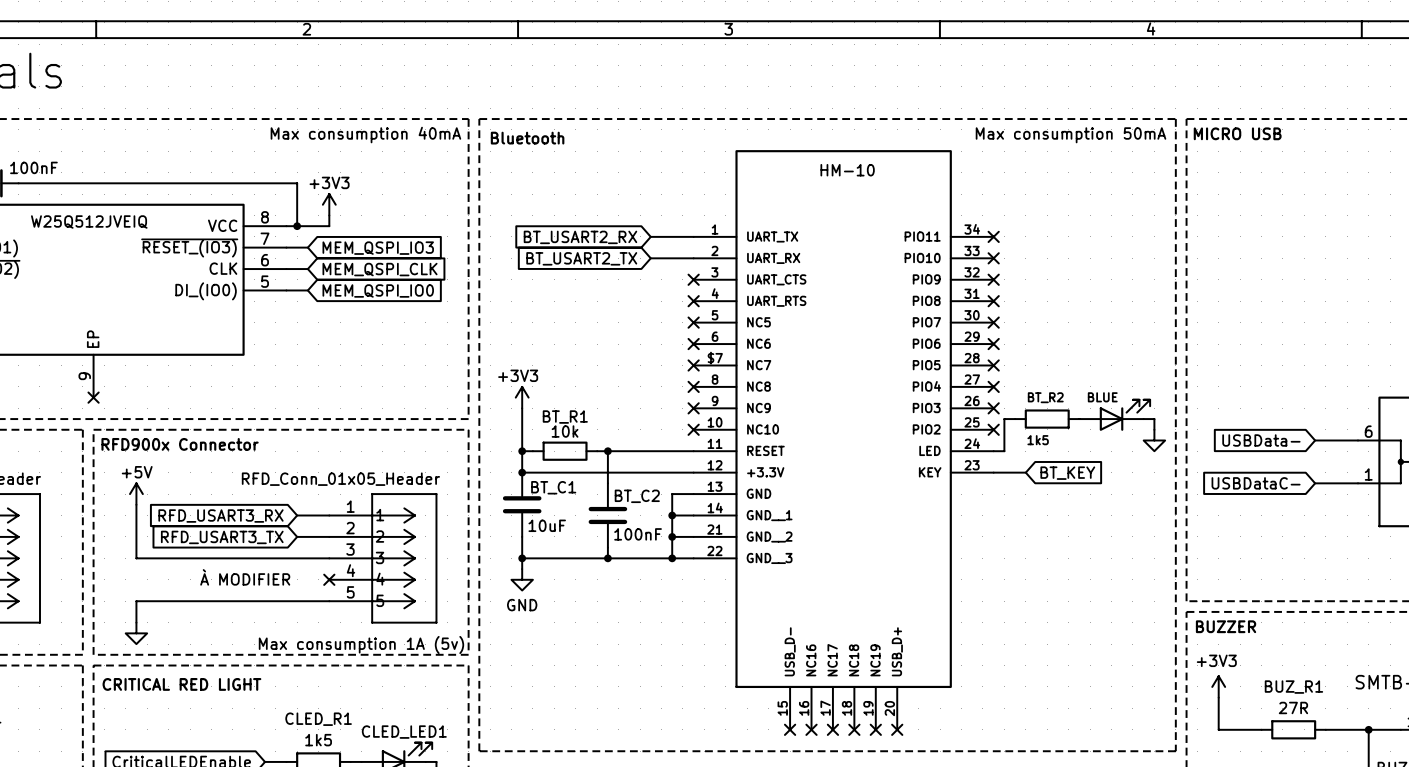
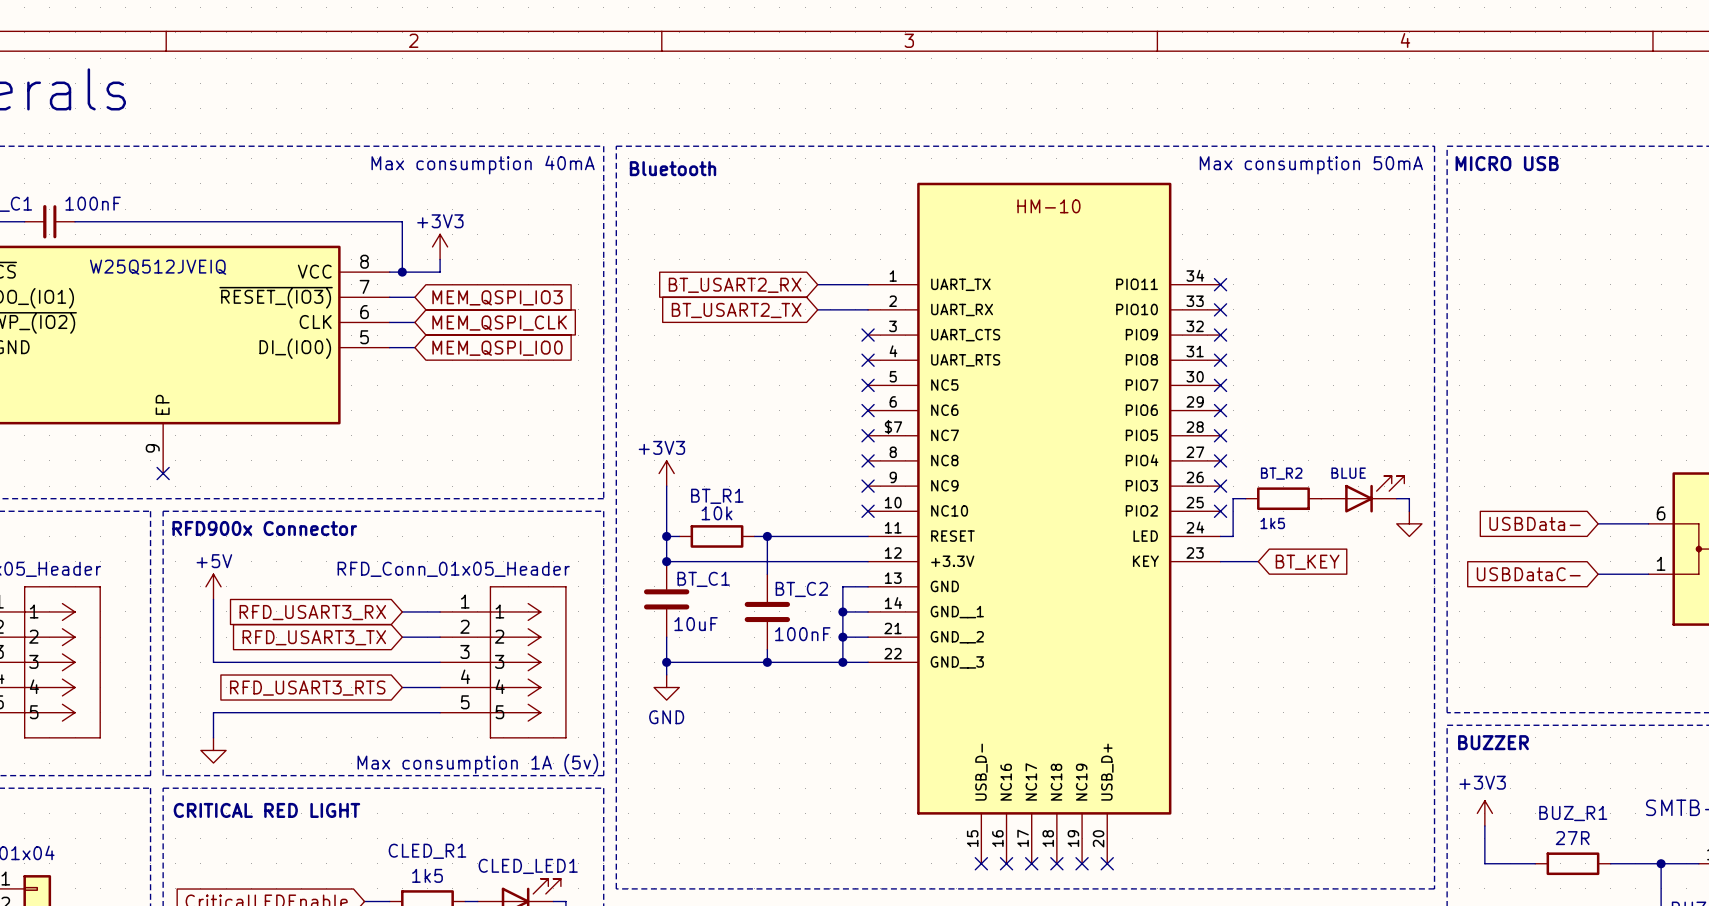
text: À MODIFIER (245, 577) -> none
wire: none -> (402, 687) (440, 687)
no-connect mark: (329, 579) -> none
global label: none -> RFD_USART3_RTS (307, 688)

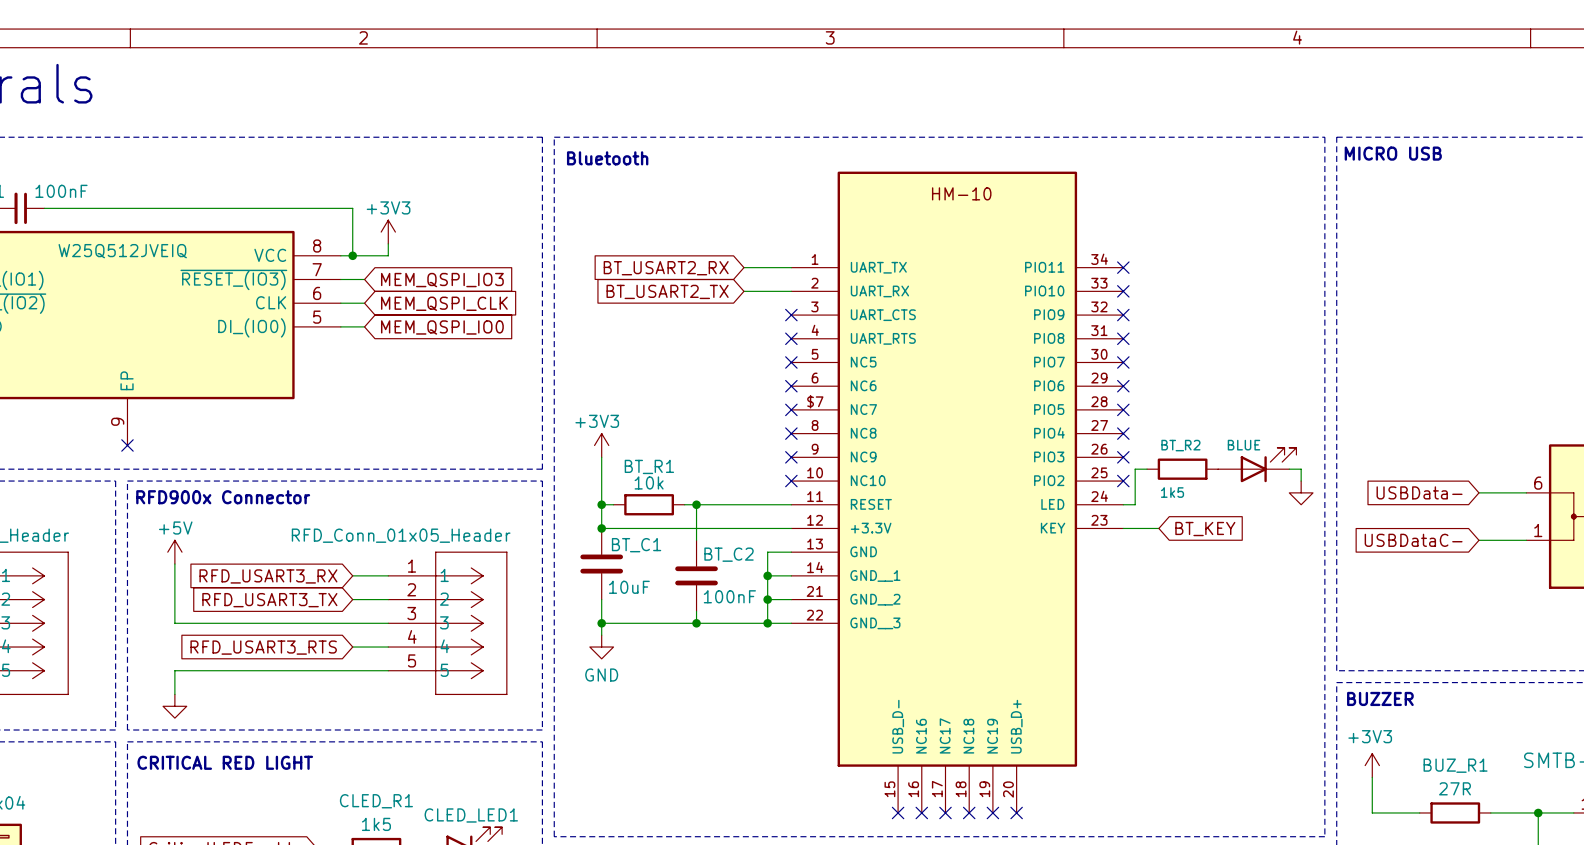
text: Max consumption 40mA (483, 165) -> none
text: Max consumption 50mA (1311, 165) -> none
text: Max consumption 1A (5v) (477, 764) -> none

